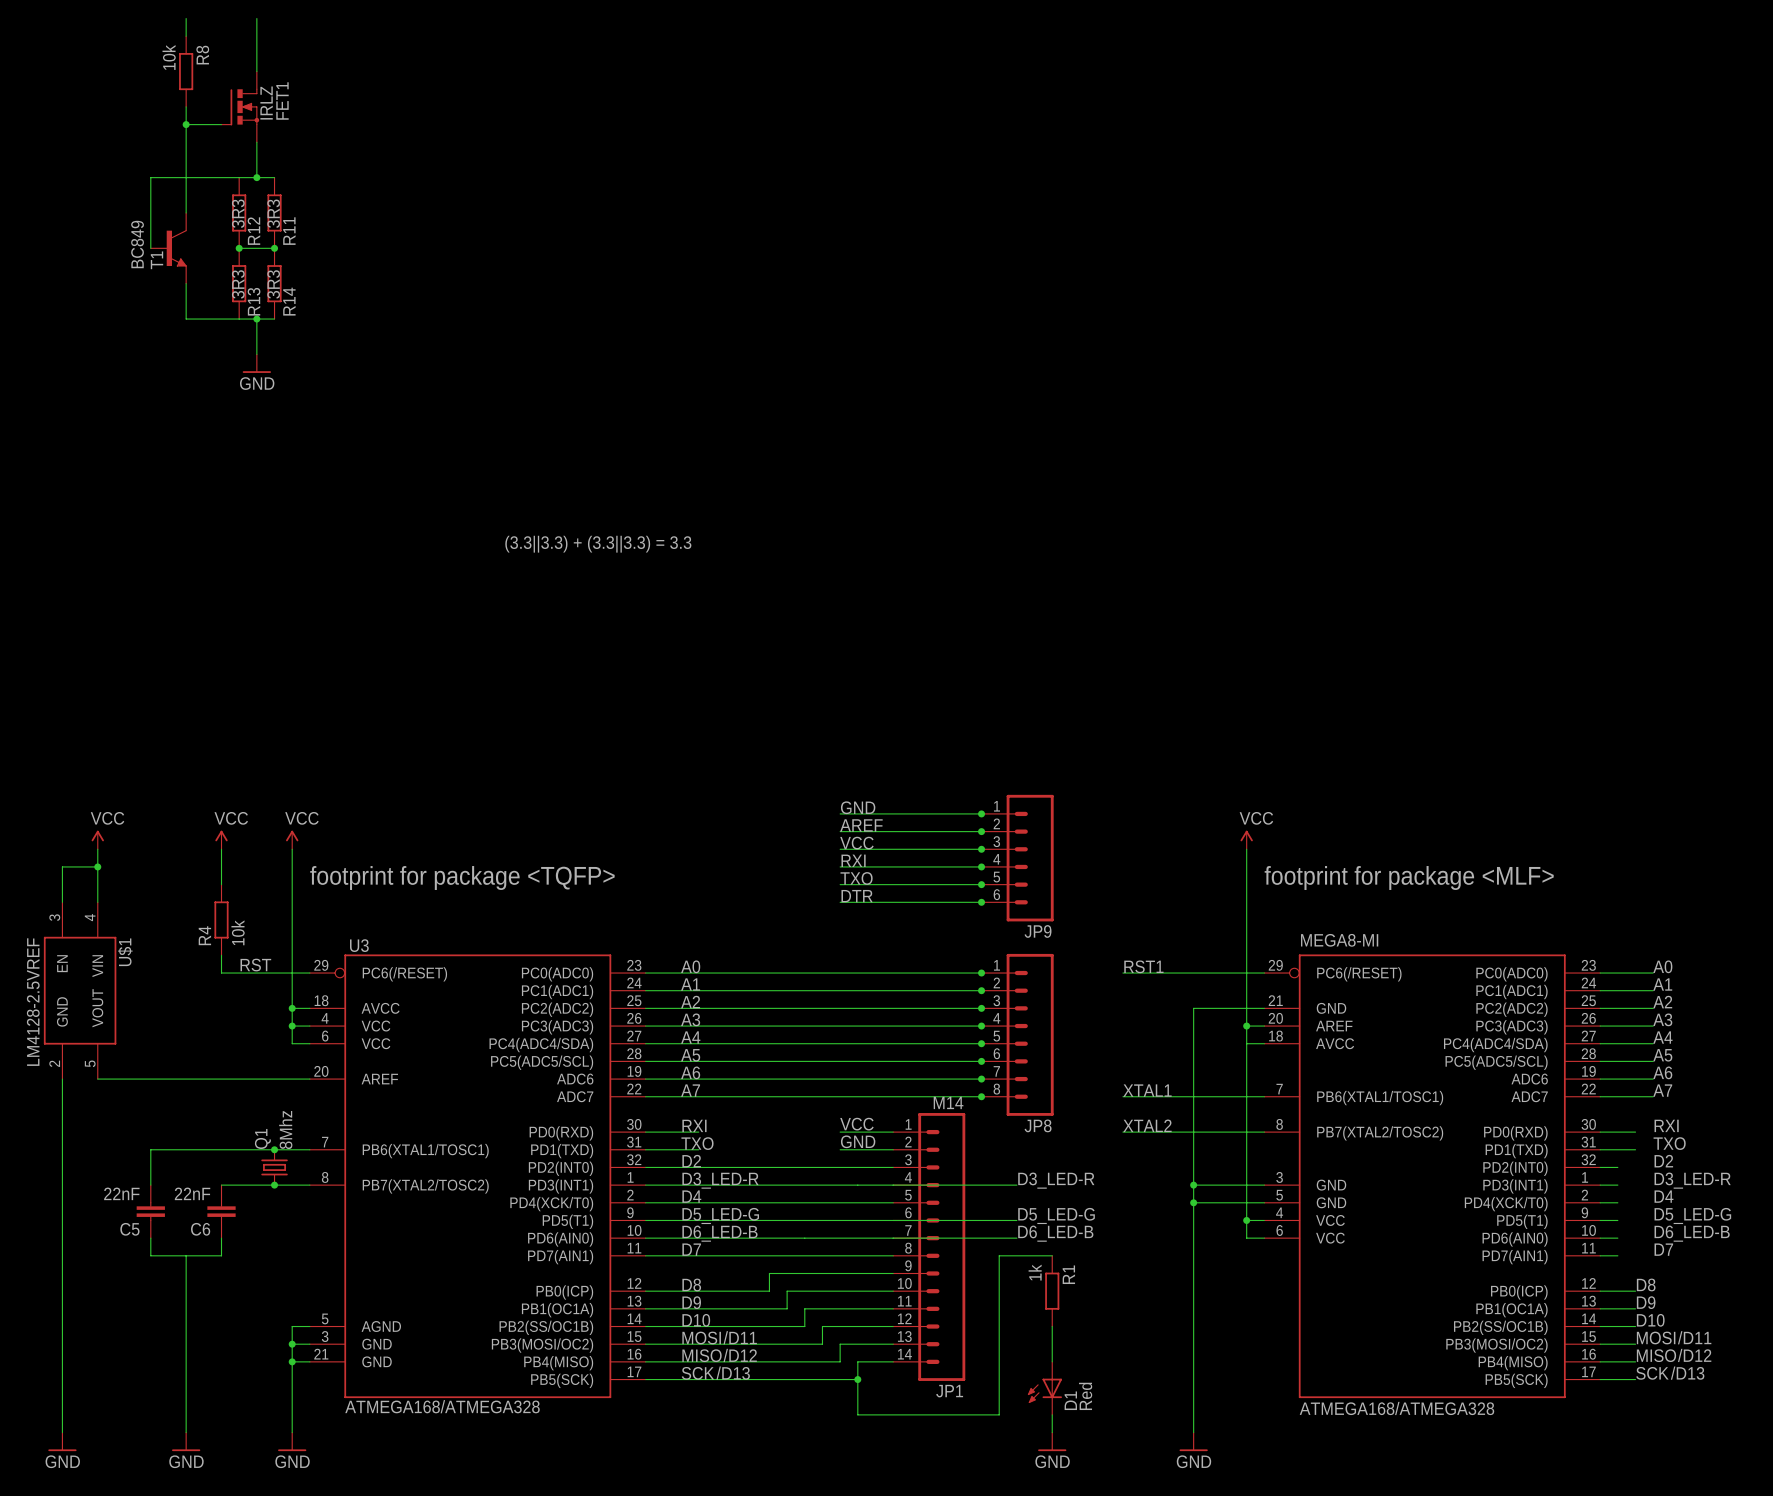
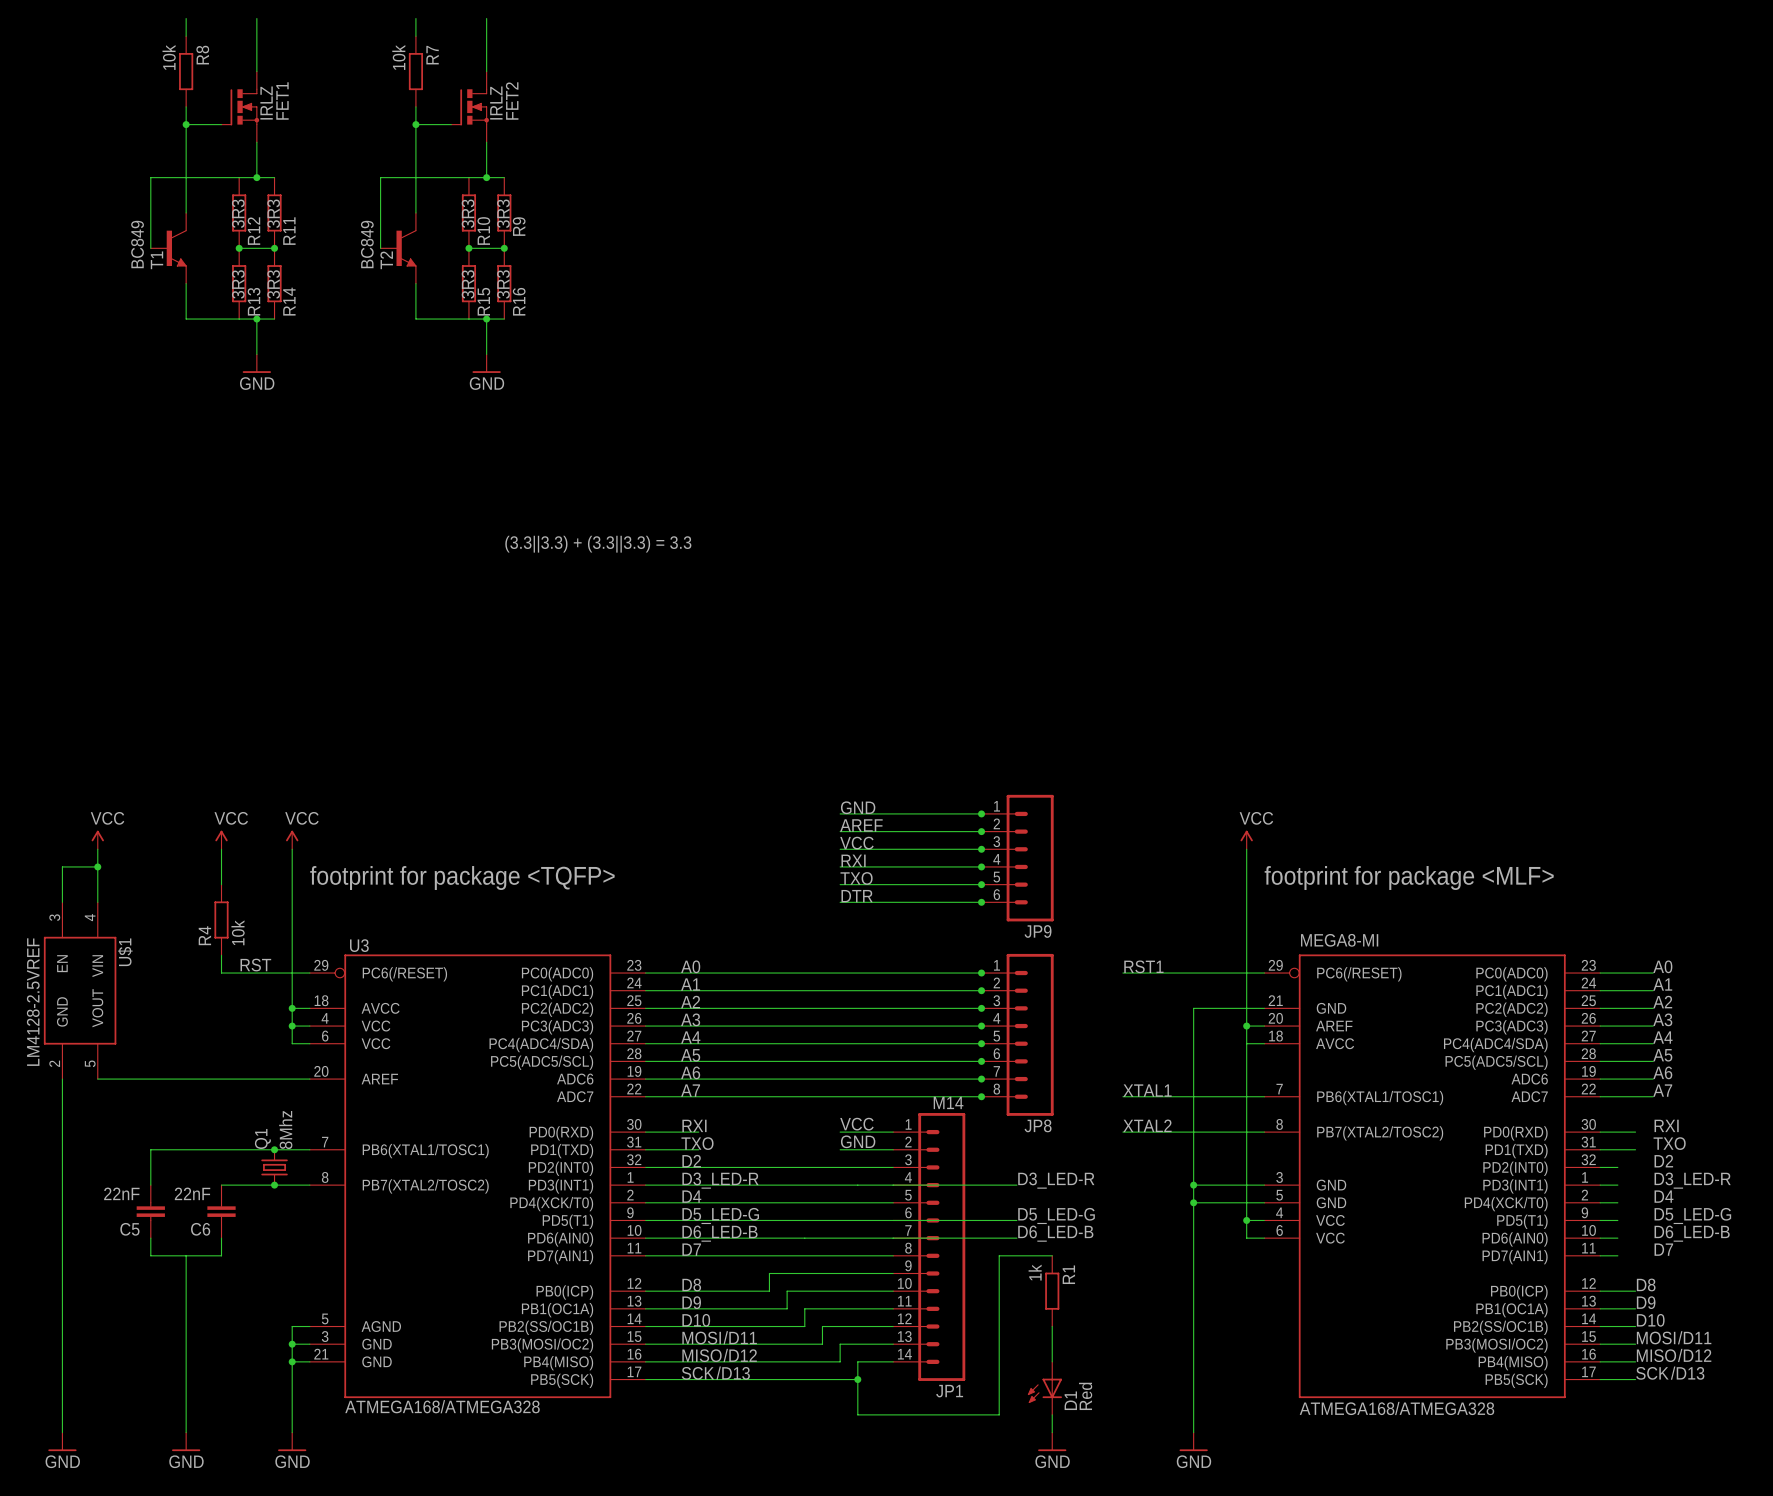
wire: none -> (415, 18) (415, 36)
wire: none -> (486, 18) (486, 71)
R7: none -> 10k (415, 71)
wire: none -> (415, 106) (415, 212)
FET2: none -> IRLZ (469, 106)
wire: none -> (415, 124) (451, 124)
junction: none -> (415, 124)
wire: none -> (486, 142) (486, 177)
junction: none -> (486, 177)
wire: none -> (504, 177) (380, 177) (380, 248)
R10: none -> 3R3 (468, 212)
R9: none -> 3R3 (504, 212)
T2: none -> BC849 (398, 248)
wire: none -> (468, 248) (504, 248)
junction: none -> (468, 248)
junction: none -> (504, 248)
wire: none -> (415, 283) (415, 319) (504, 319)
R15: none -> 3R3 (468, 283)
R16: none -> 3R3 (504, 283)
wire: none -> (486, 319) (486, 354)
junction: none -> (486, 319)
power symbol: none -> GND (486, 363)

